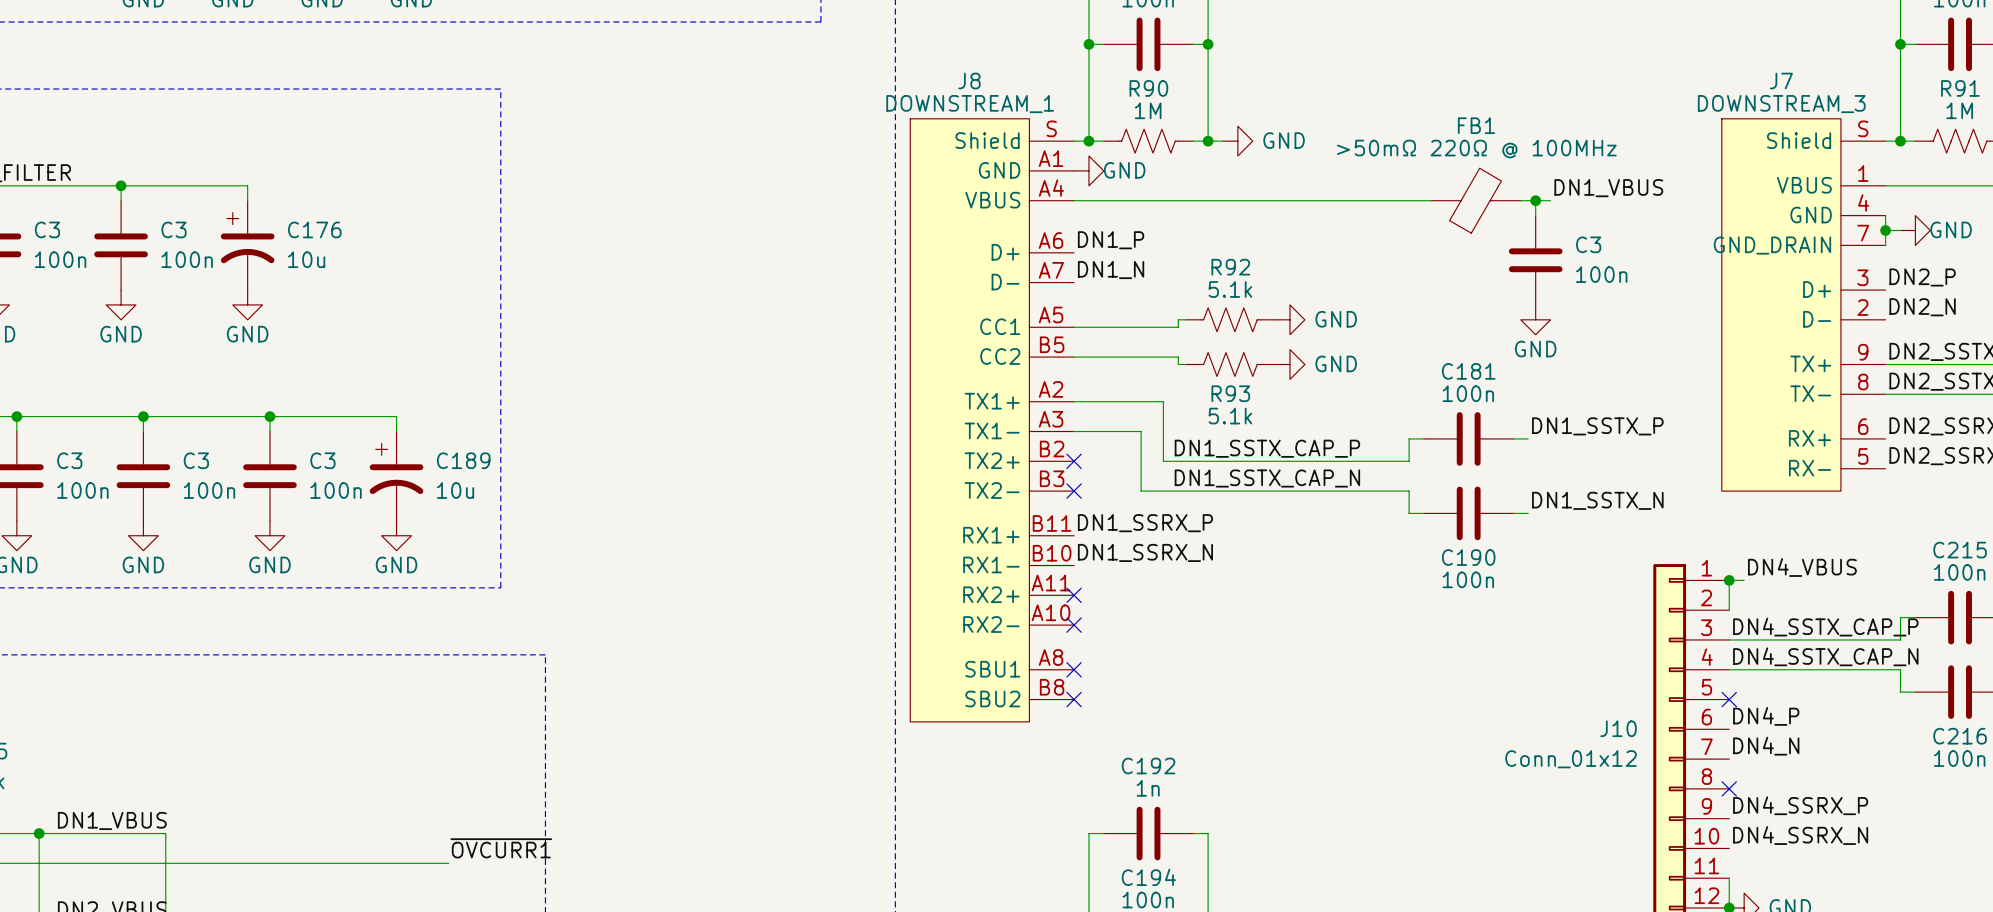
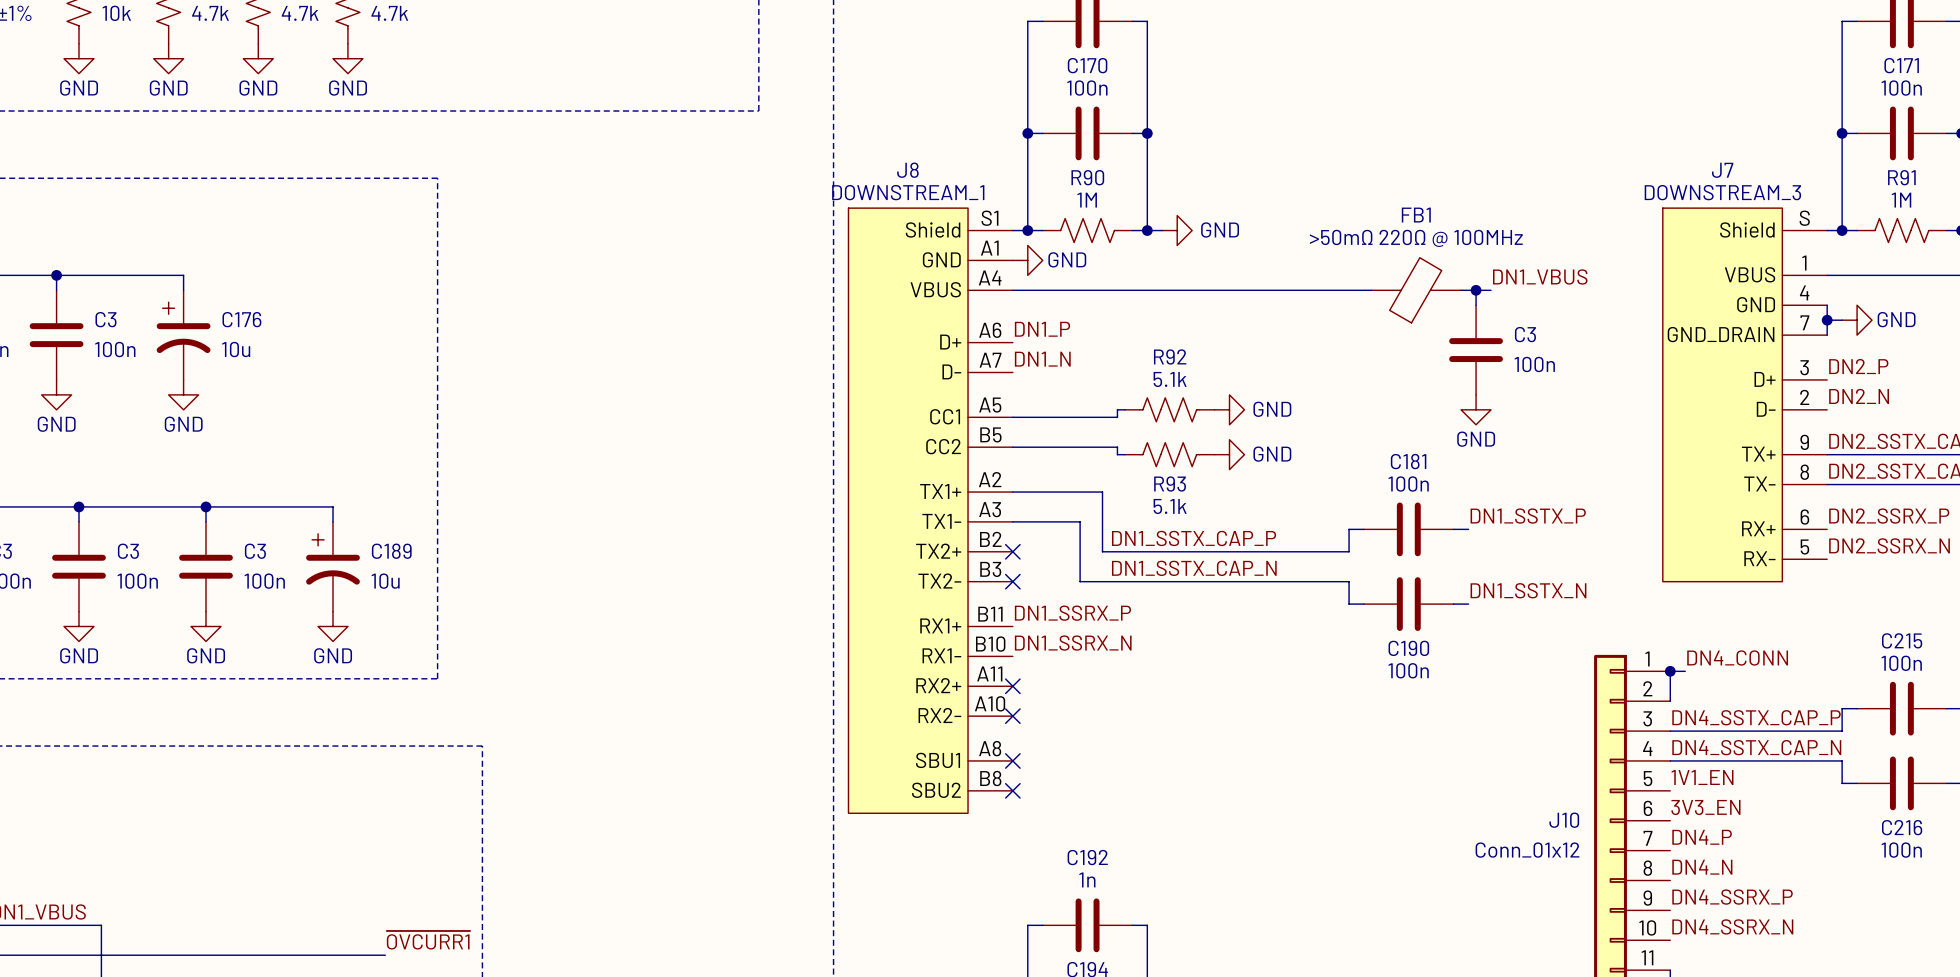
J8 pin number: S (1051, 128) -> S1 (990, 218)
label: DN4_VBUS (1802, 567) -> DN4_CONN (1737, 658)
label: none -> 1V1_EN (1702, 777)
no-connect mark: (1729, 699) -> none
label: DN4_P (1766, 716) -> 3V3_EN (1705, 807)
label: DN4_N (1766, 746) -> DN4_P (1702, 837)
label: none -> DN4_N (1702, 867)
no-connect mark: (1729, 788) -> none

